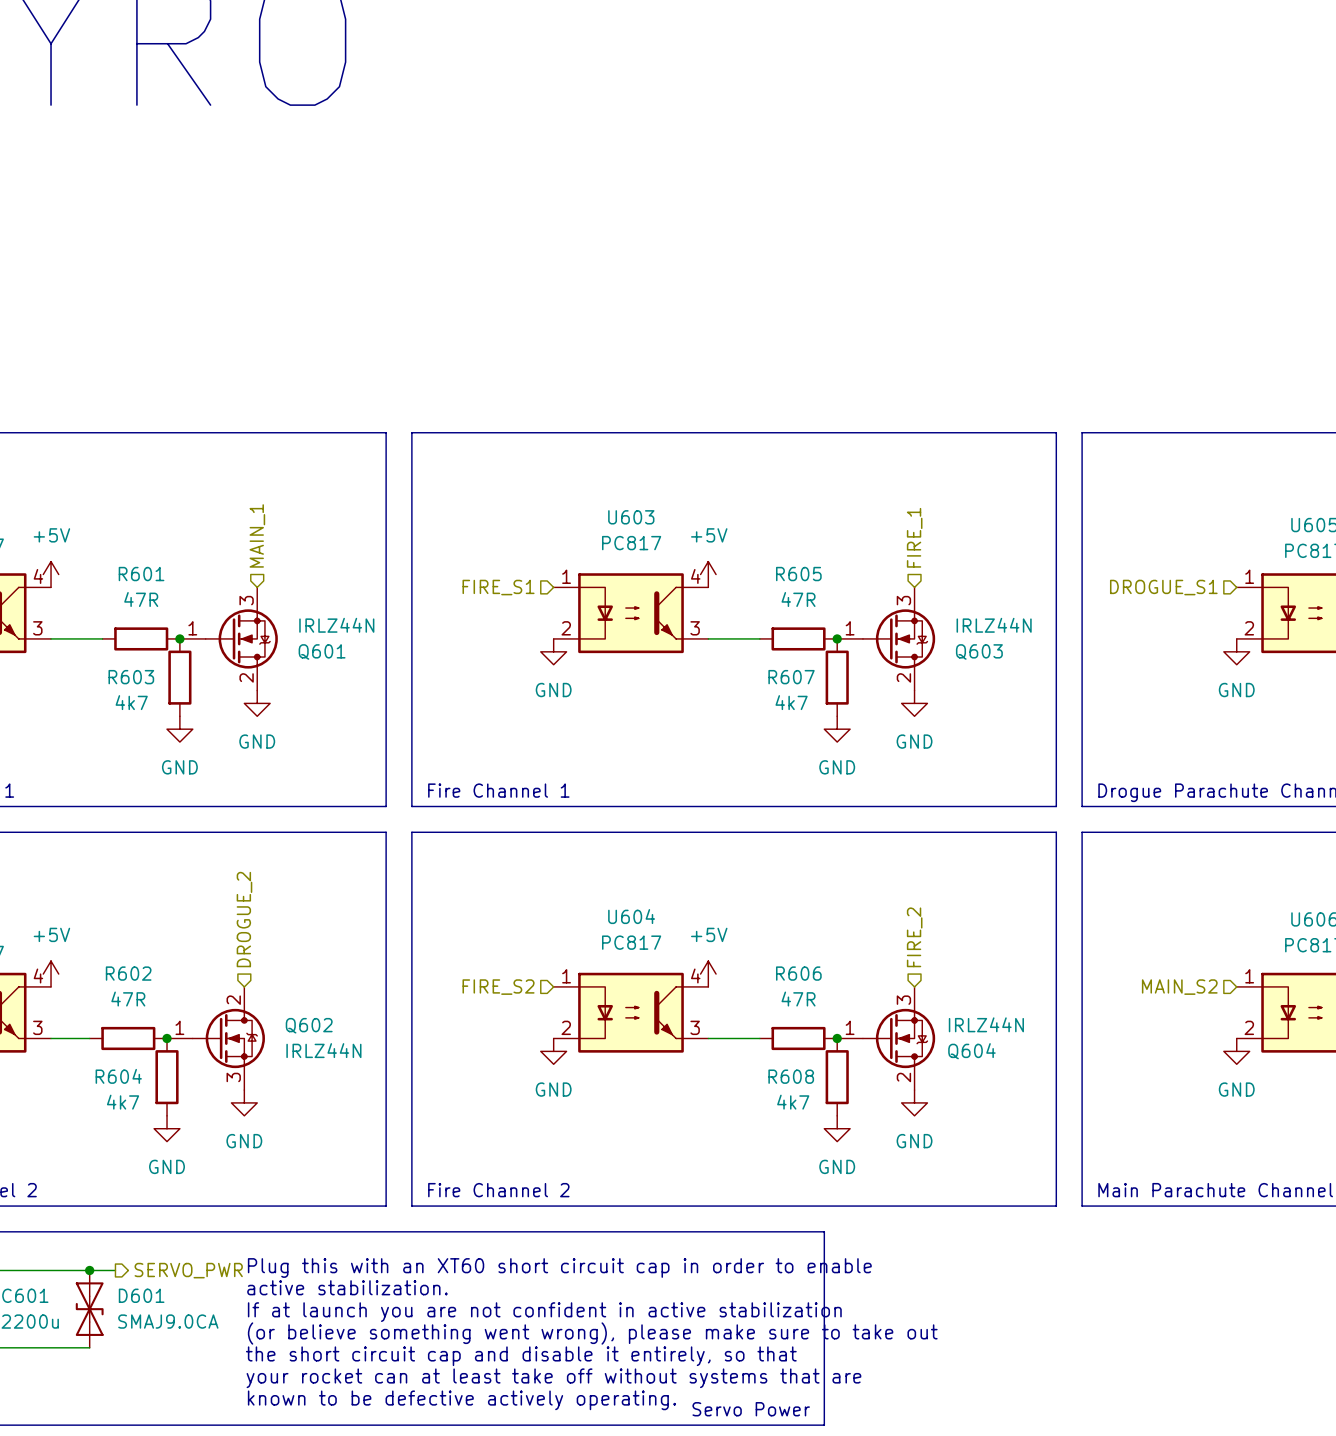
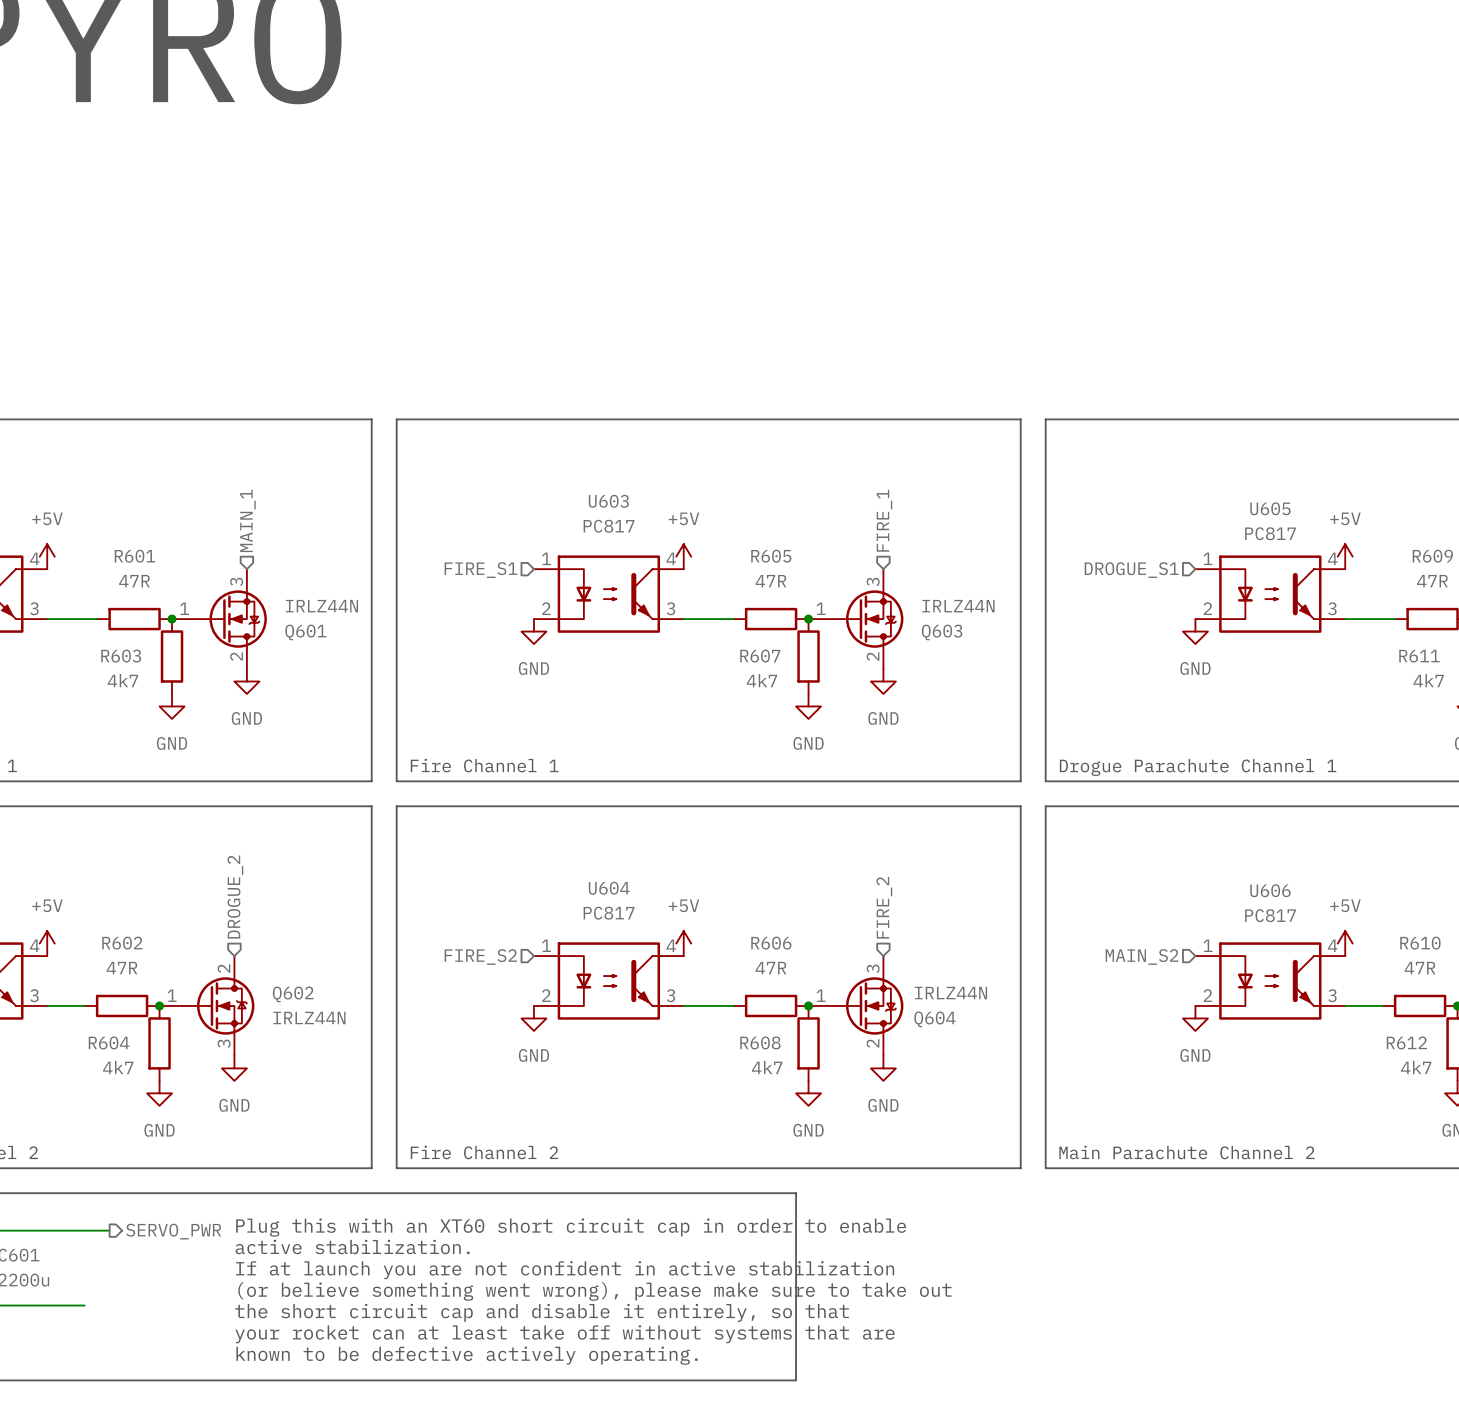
junction: (89, 1270) -> none
D601: SMAJ9.0CA (89, 1309) -> none
text: Servo Power (751, 1409) -> none

